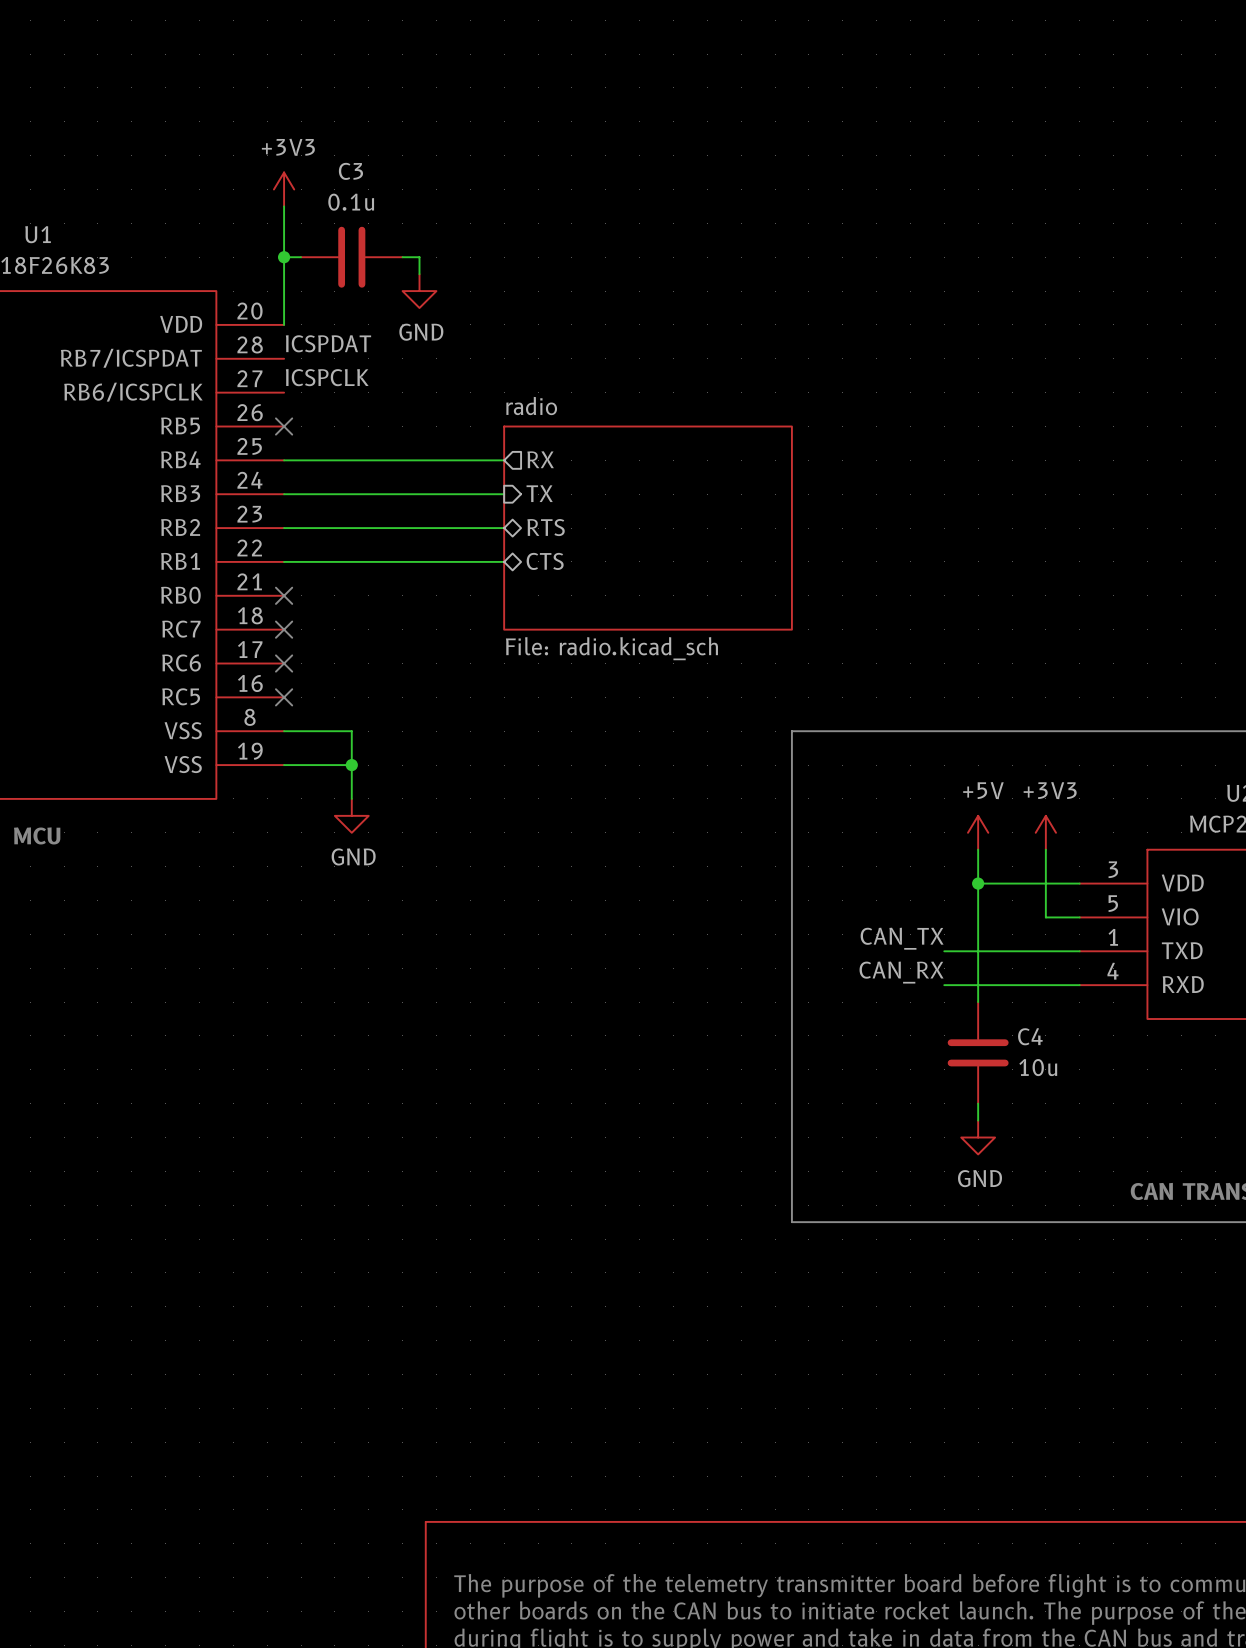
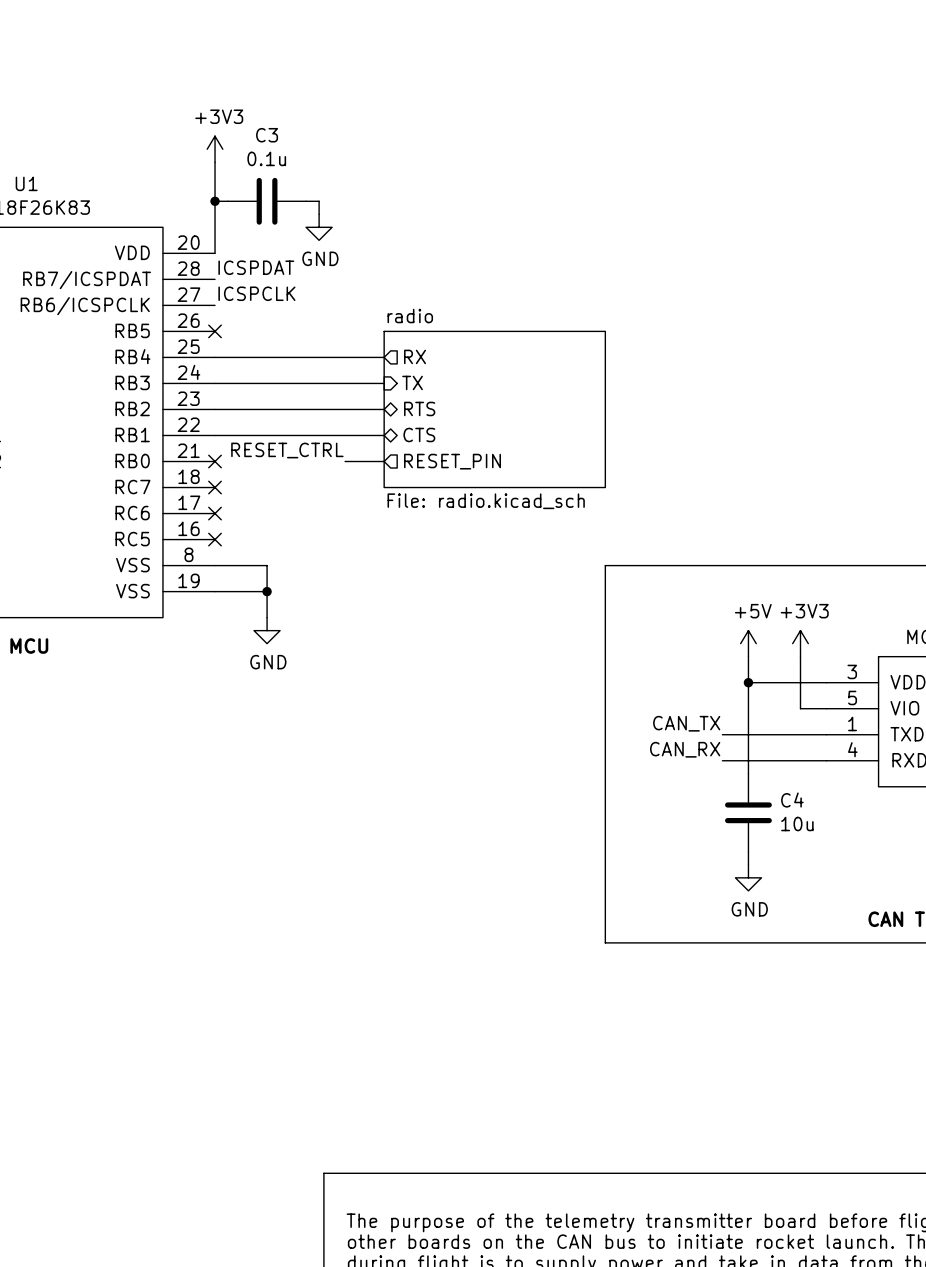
label: none -> RESET_CTRL (287, 450)
wire: none -> (345, 461) (384, 461)
sheet pin: none -> RESET_PIN (452, 461)

